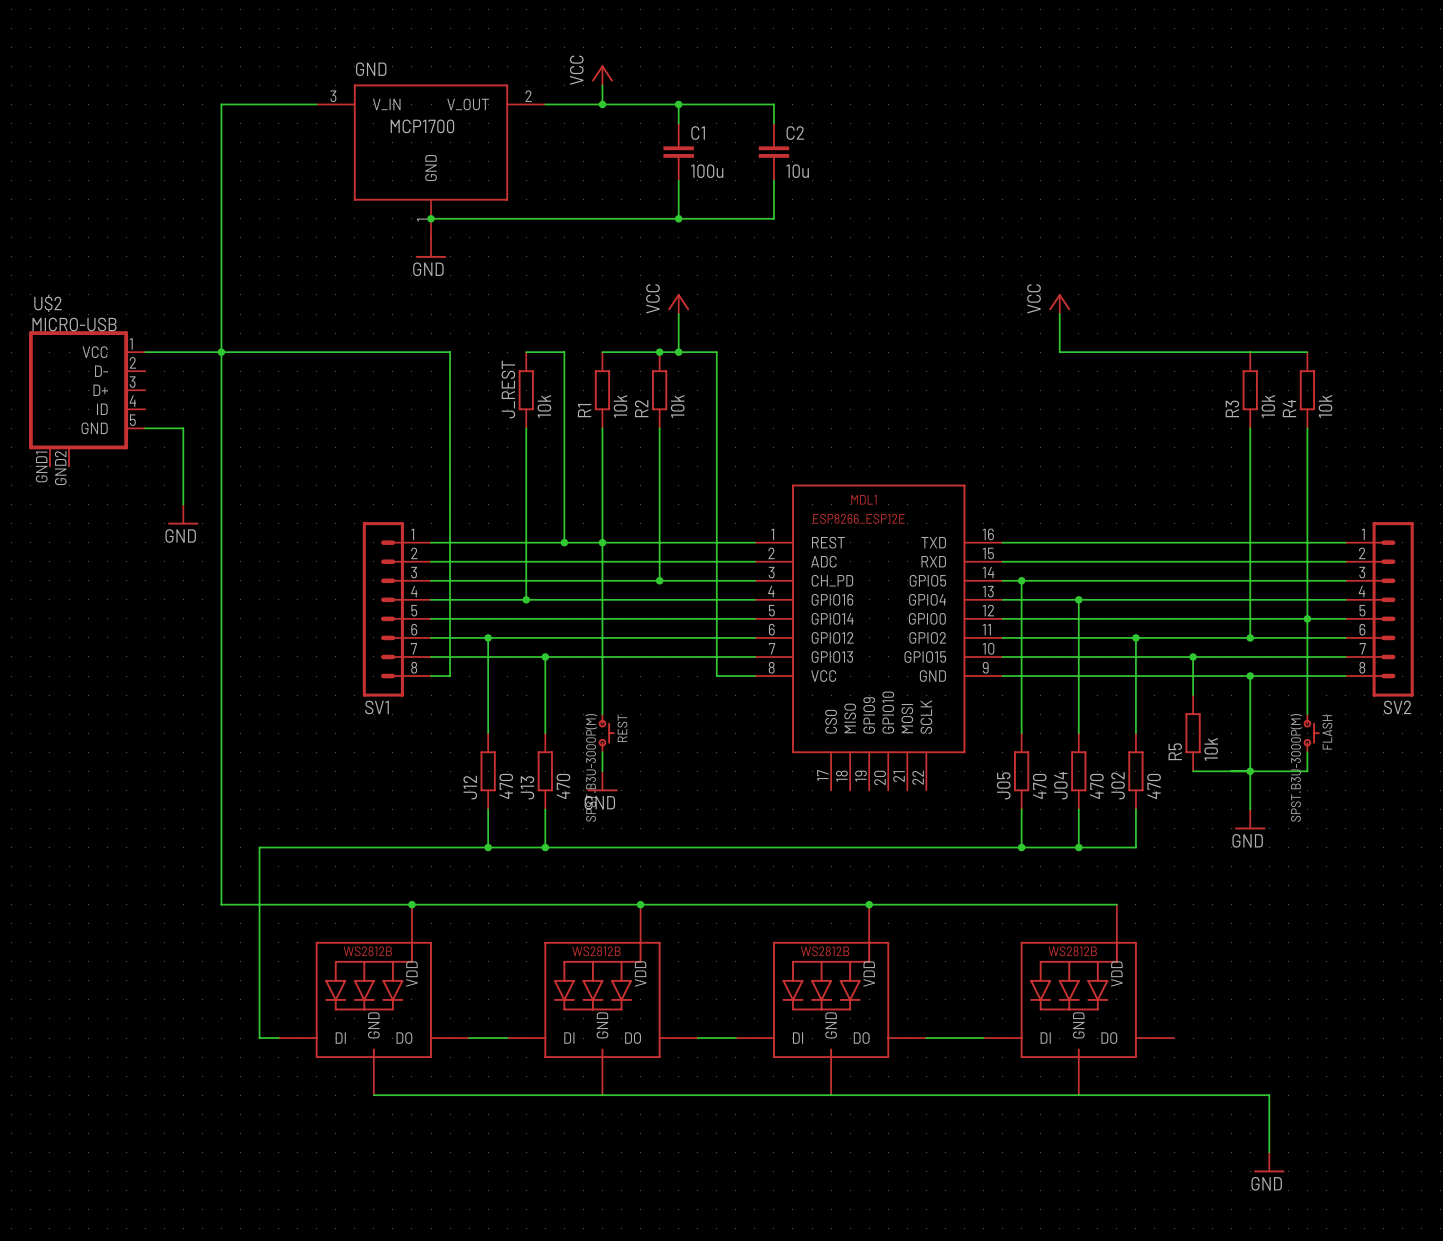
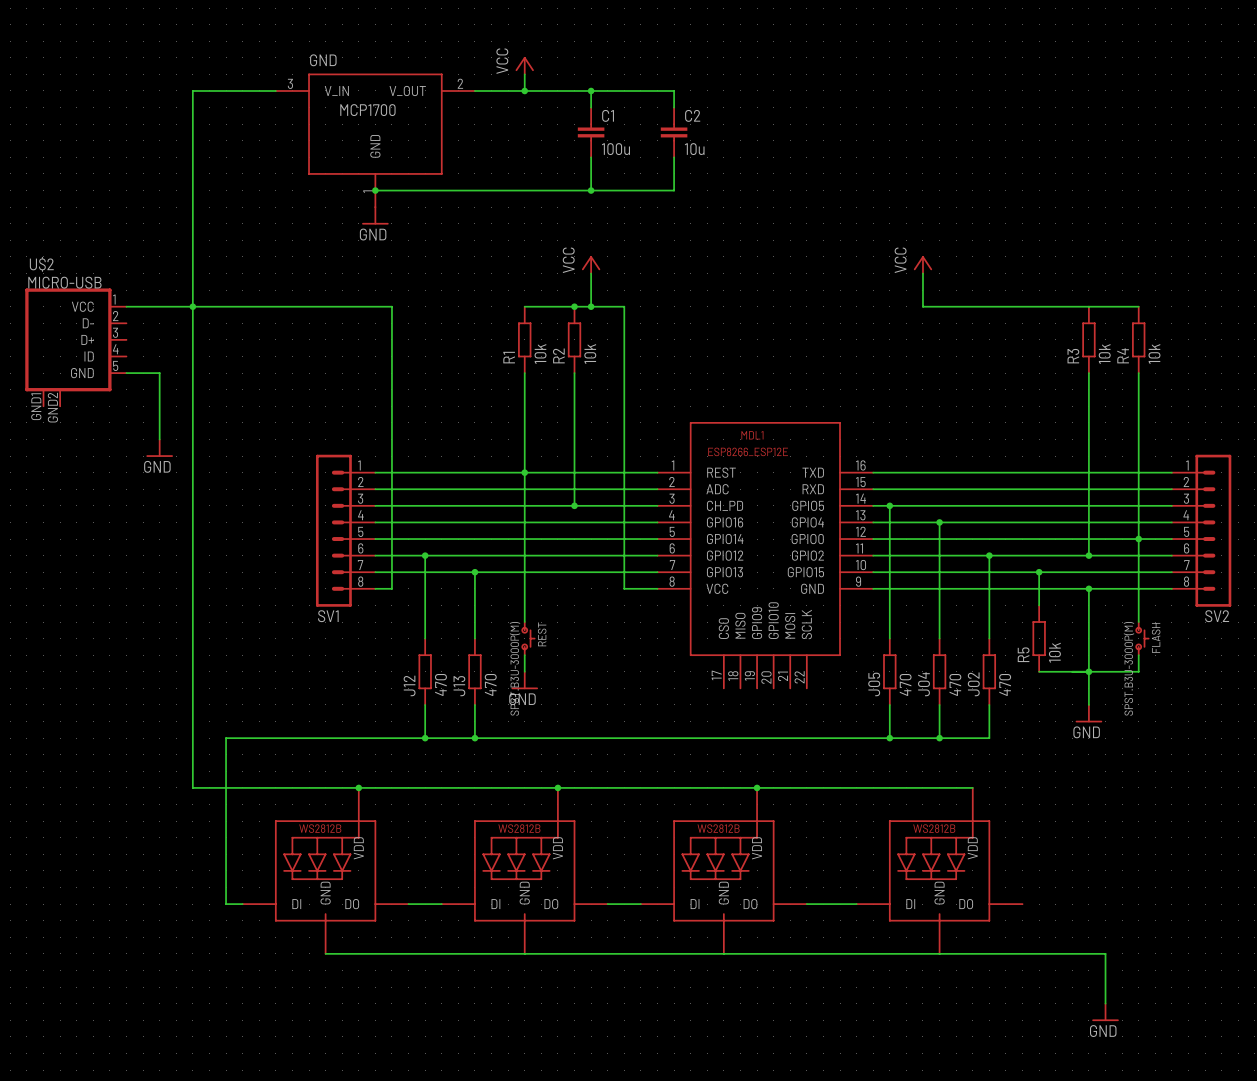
wire: (526, 352) (564, 352) (564, 542) -> none
J_REST: 10k (526, 390) -> none
wire: (526, 428) (526, 599) -> none
junction: (564, 542) -> none
junction: (526, 599) -> none

